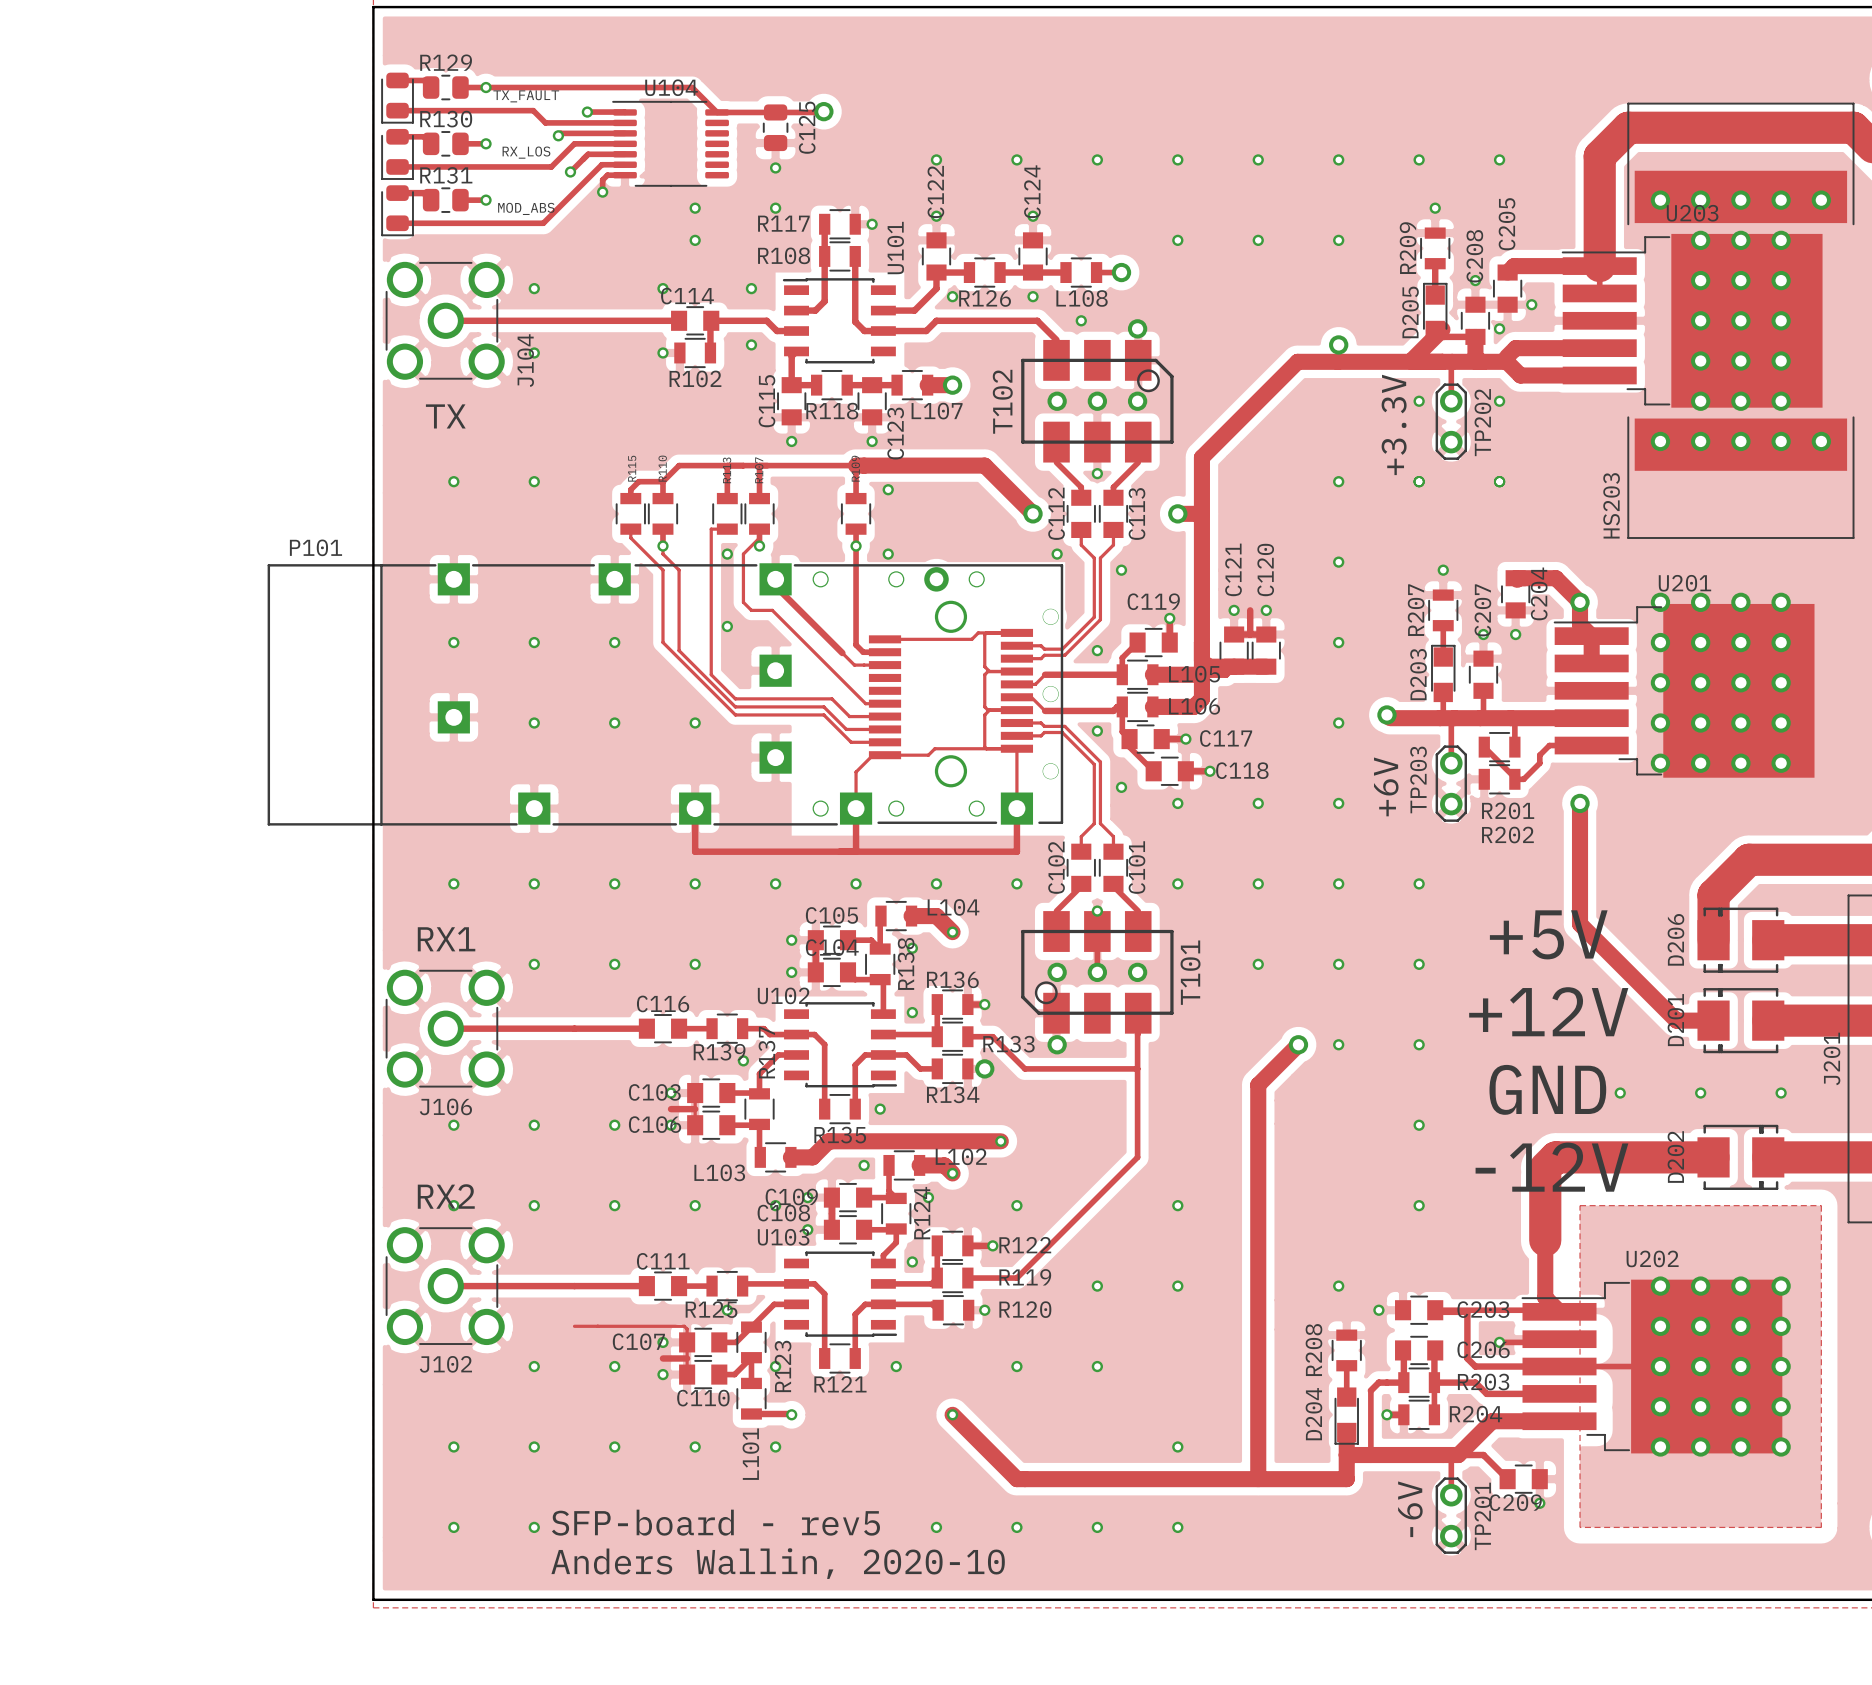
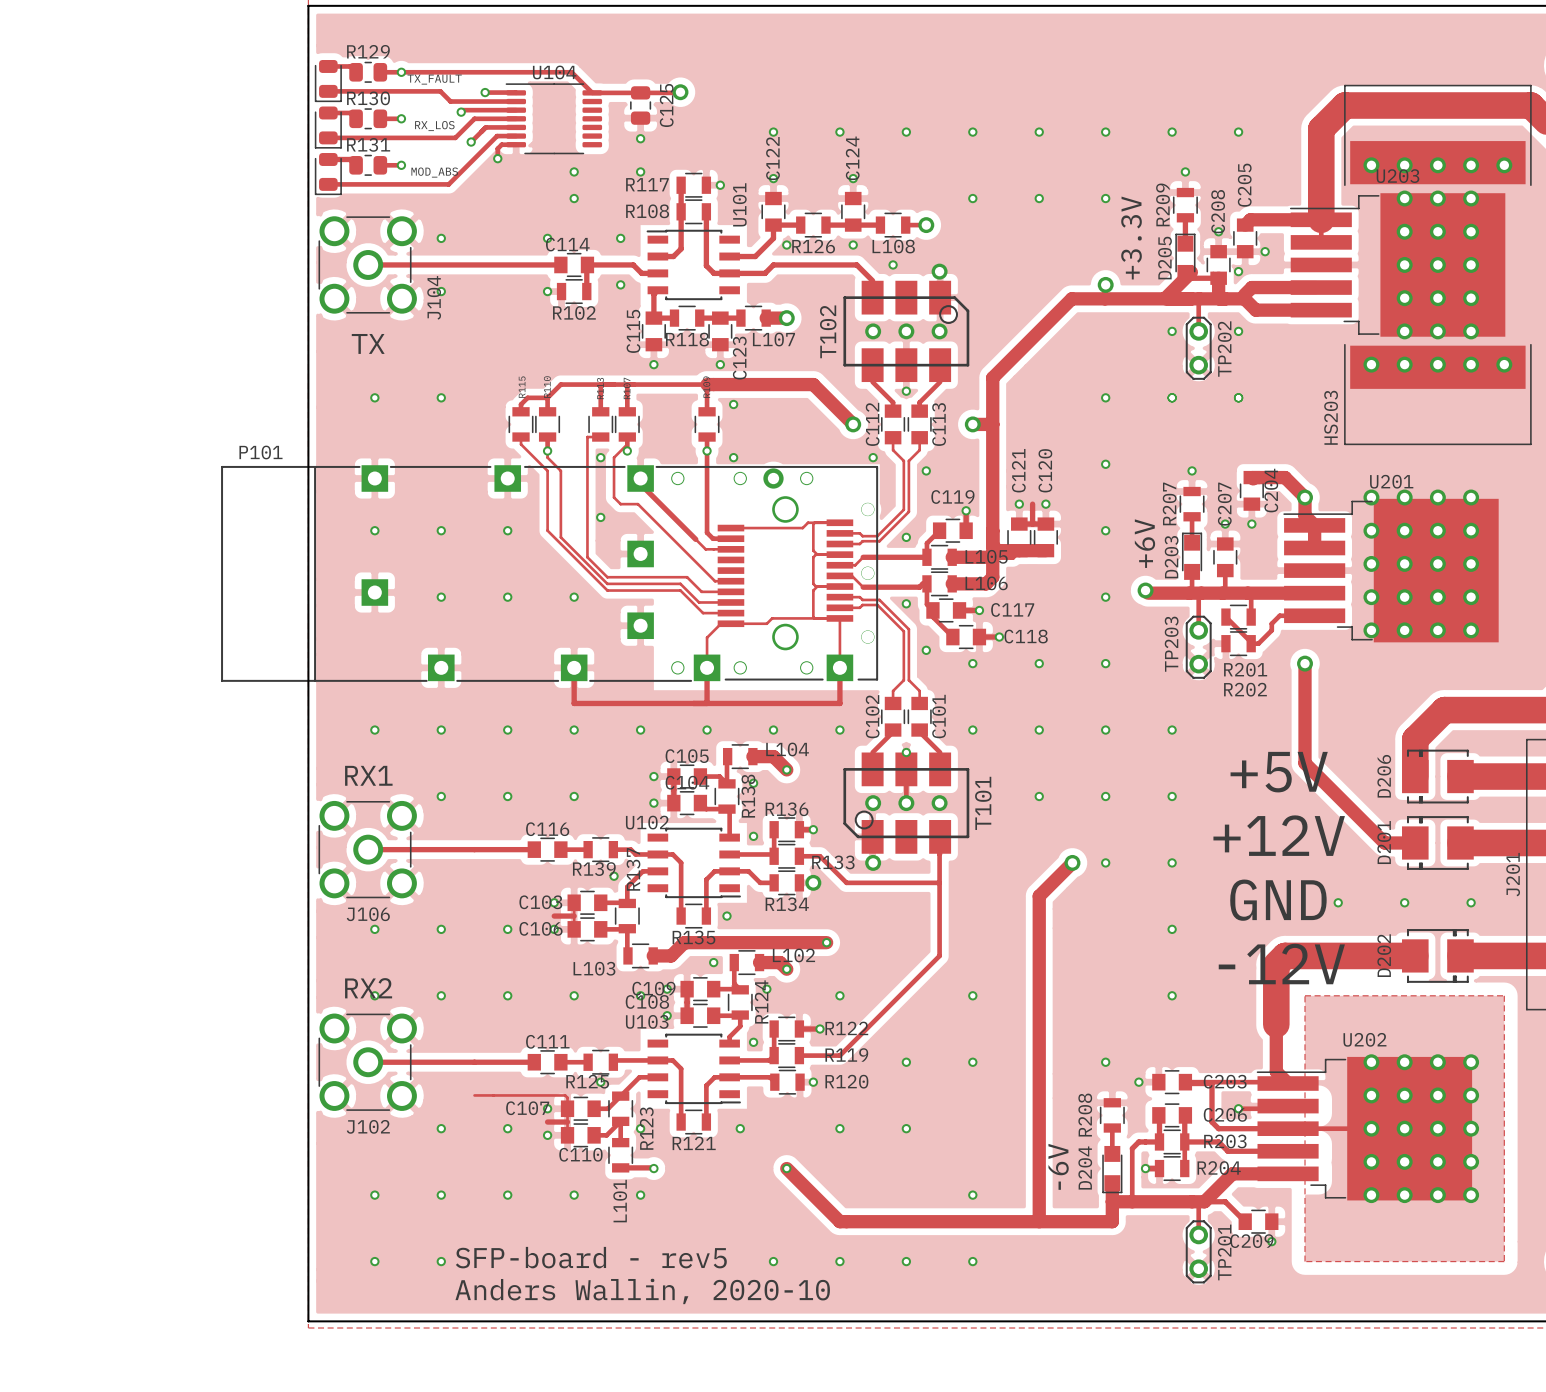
text position: +3.3V (1394, 424) -> +3.3V (1131, 238)
text position: +6V (1386, 786) -> +6V (1144, 543)
text position: -6V (1410, 1509) -> -6V (1058, 1166)

